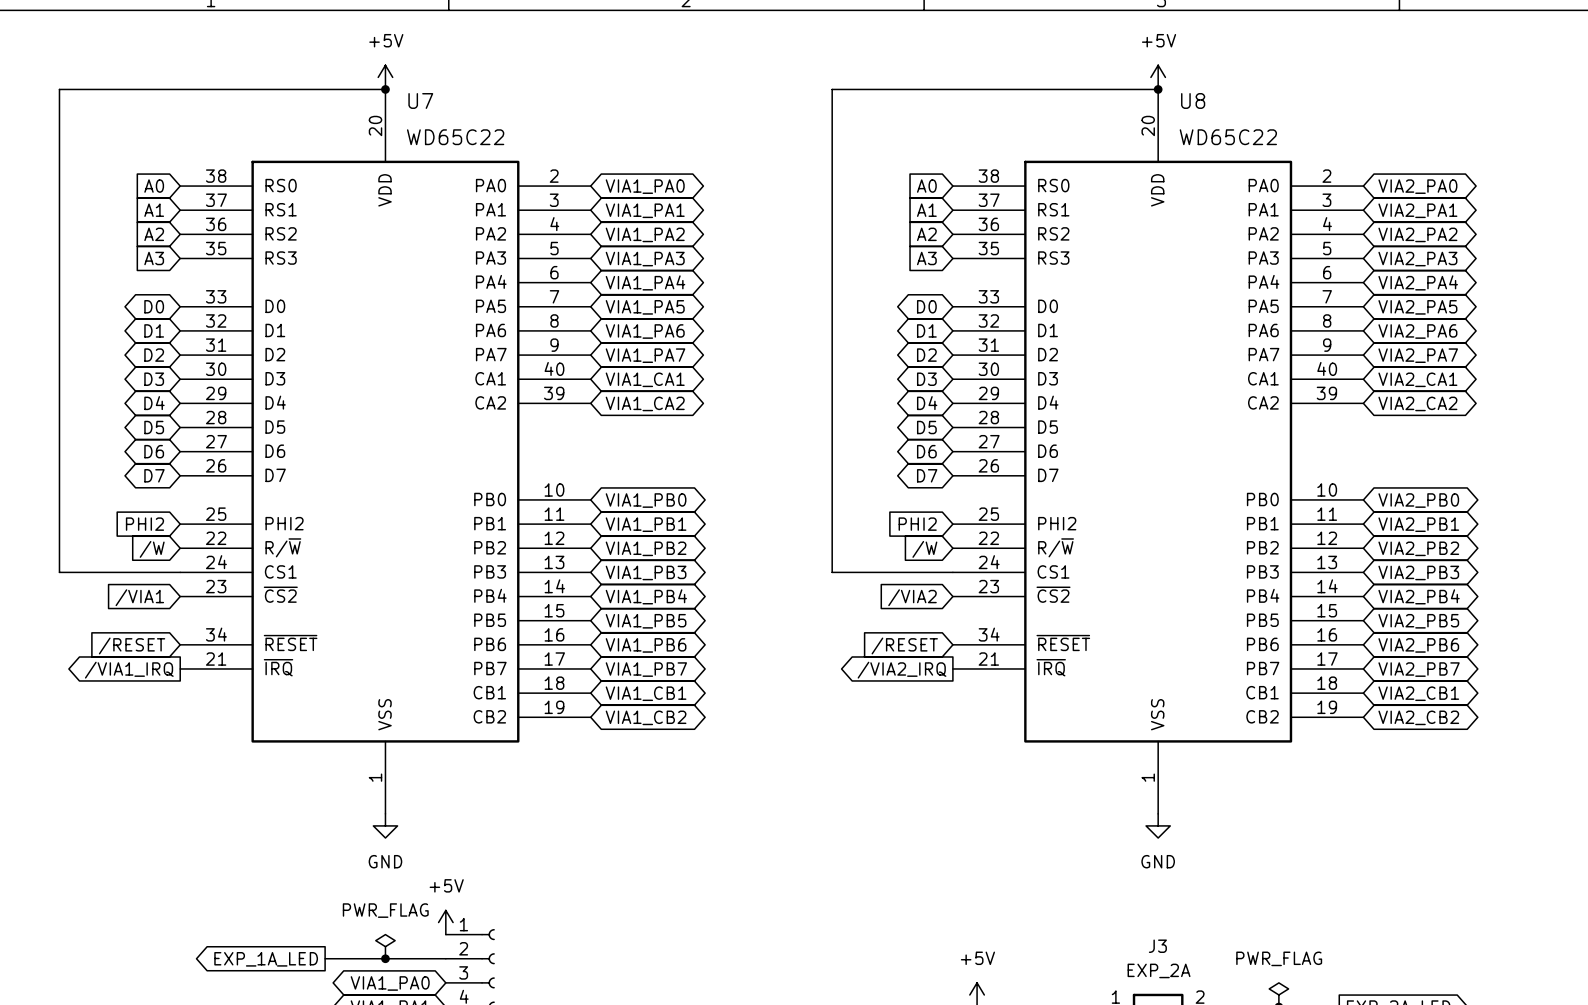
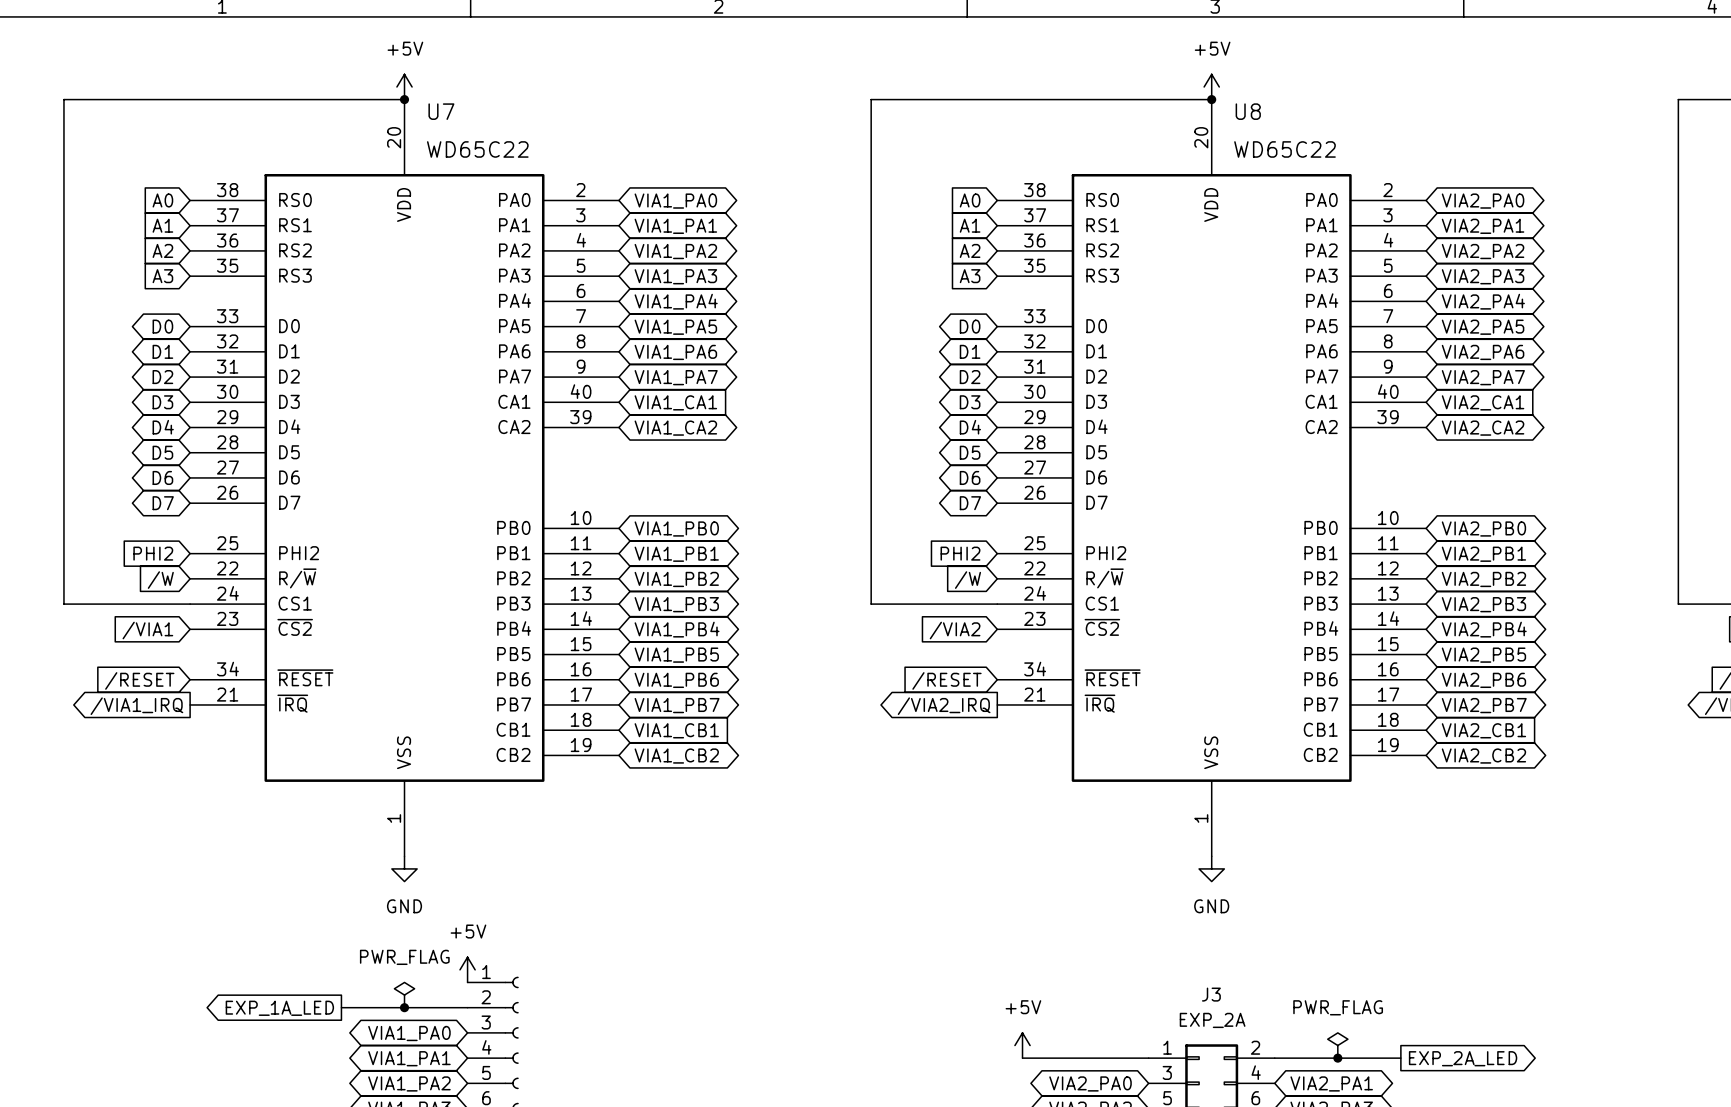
global label shape: bidirectional (645, 379) -> input (675, 402)
global label shape: bidirectional (1417, 379) -> input (1483, 402)
global label shape: bidirectional (646, 693) -> input (676, 730)
global label shape: bidirectional (1418, 693) -> input (1483, 730)

